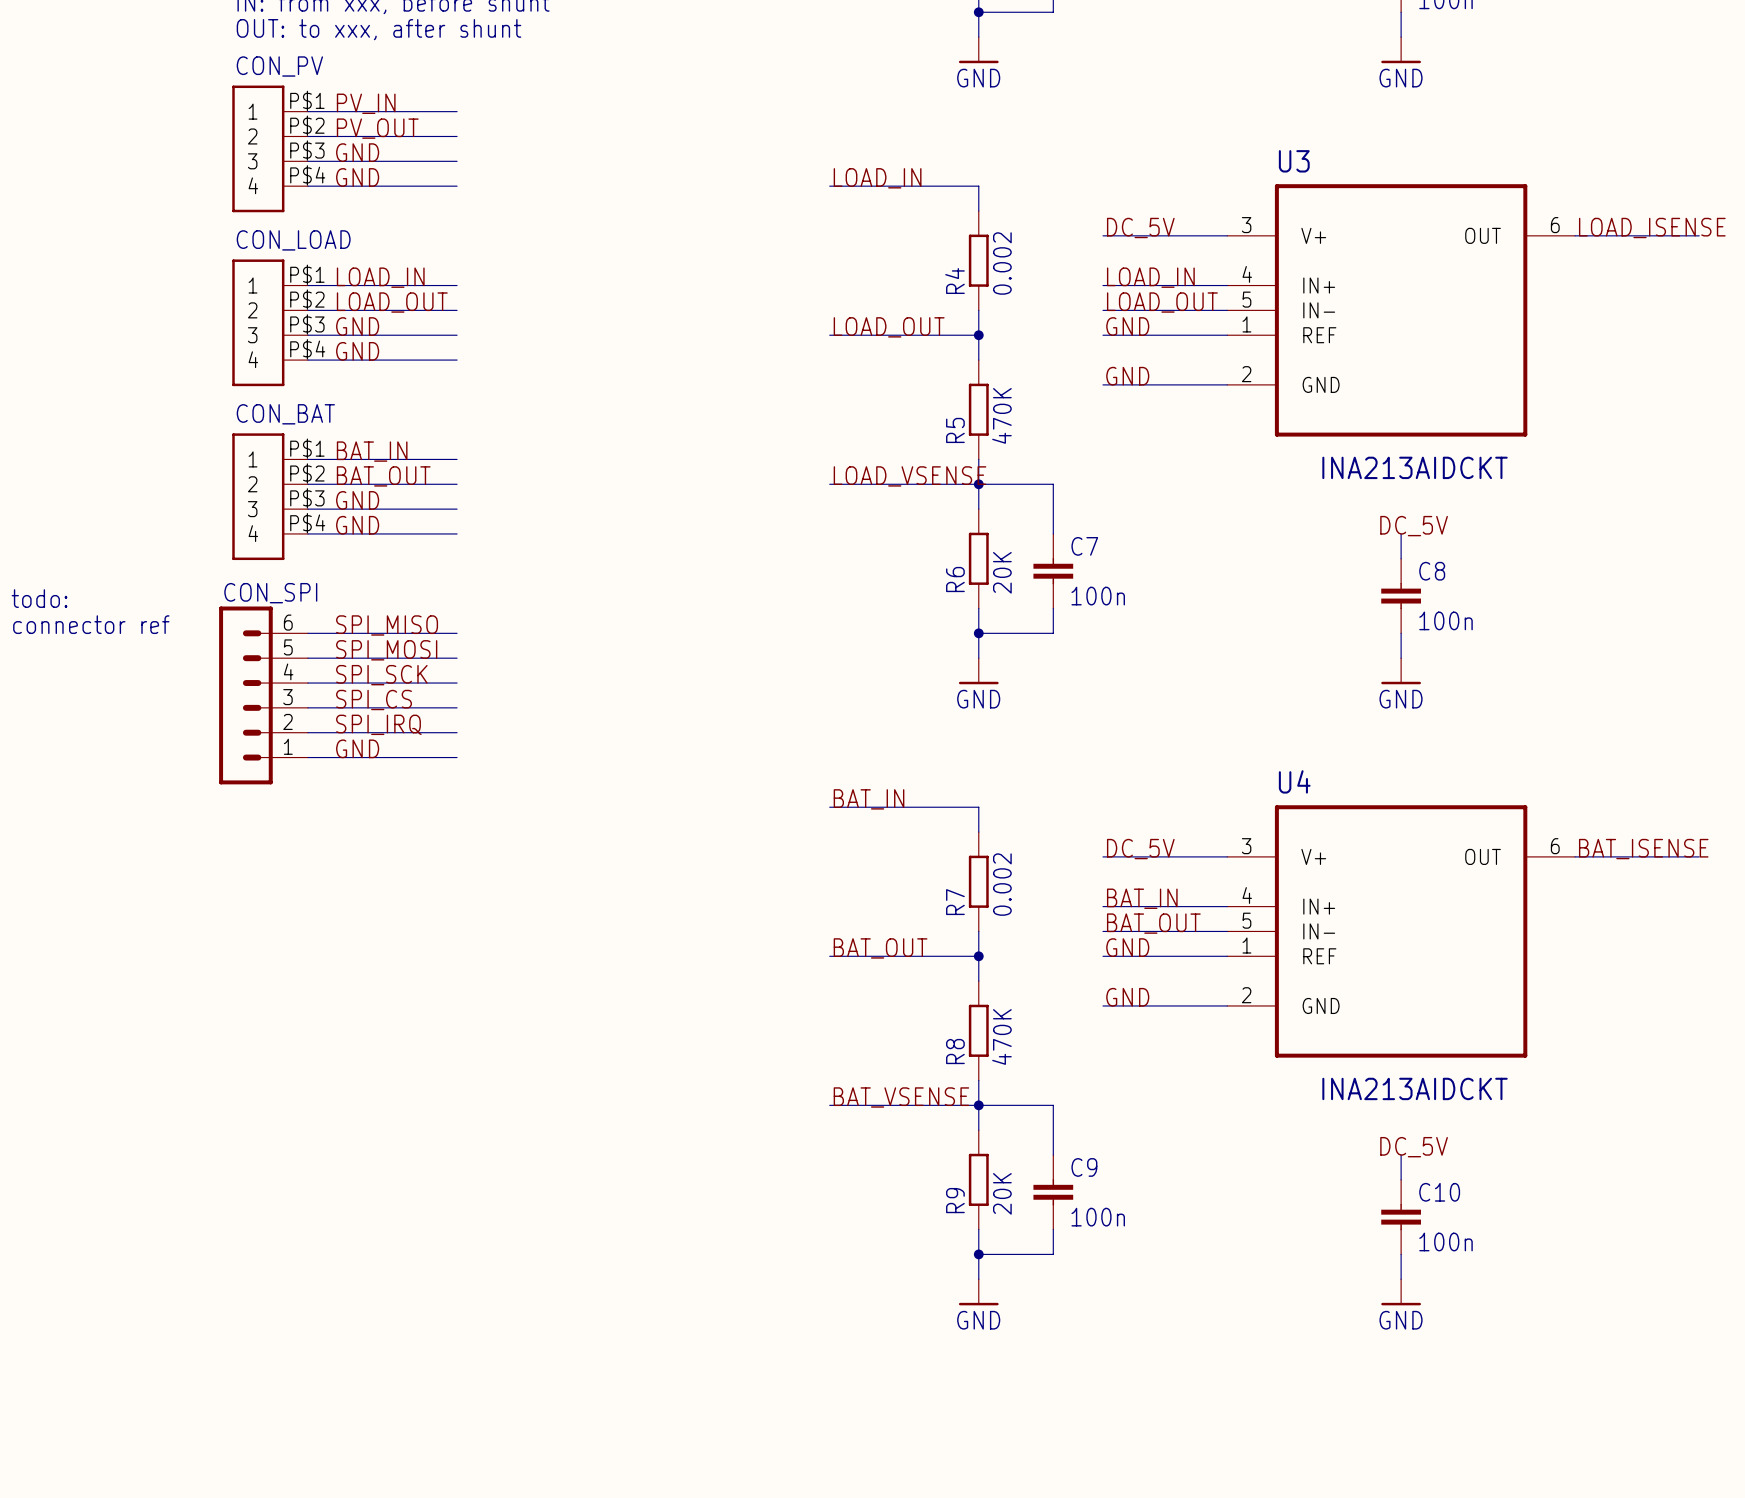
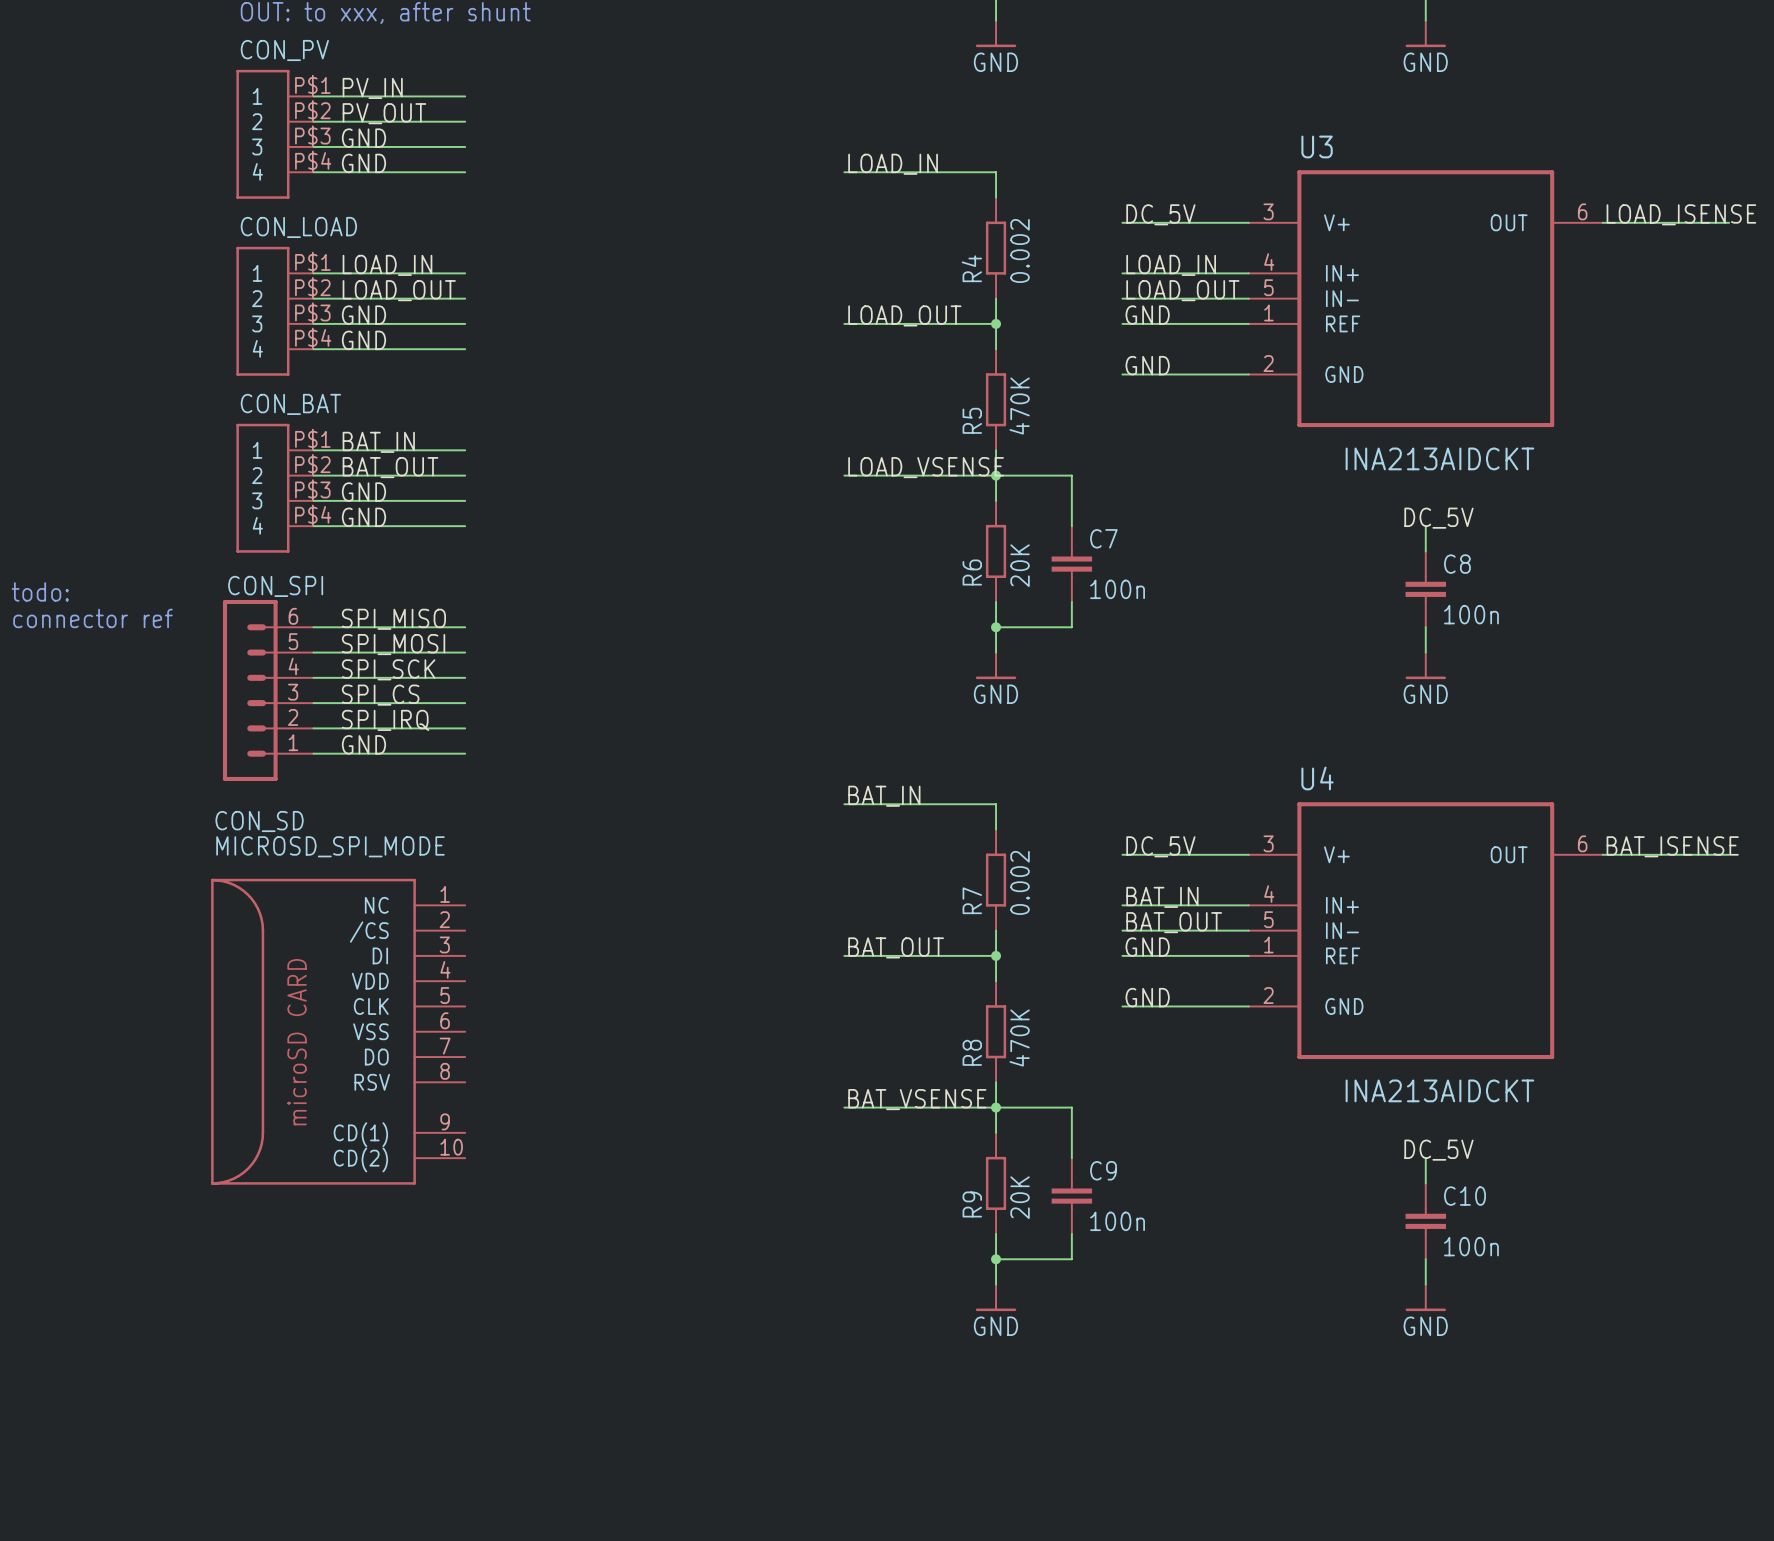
CON_SD: none -> MICROSD_SPI_MODE (338, 1031)

